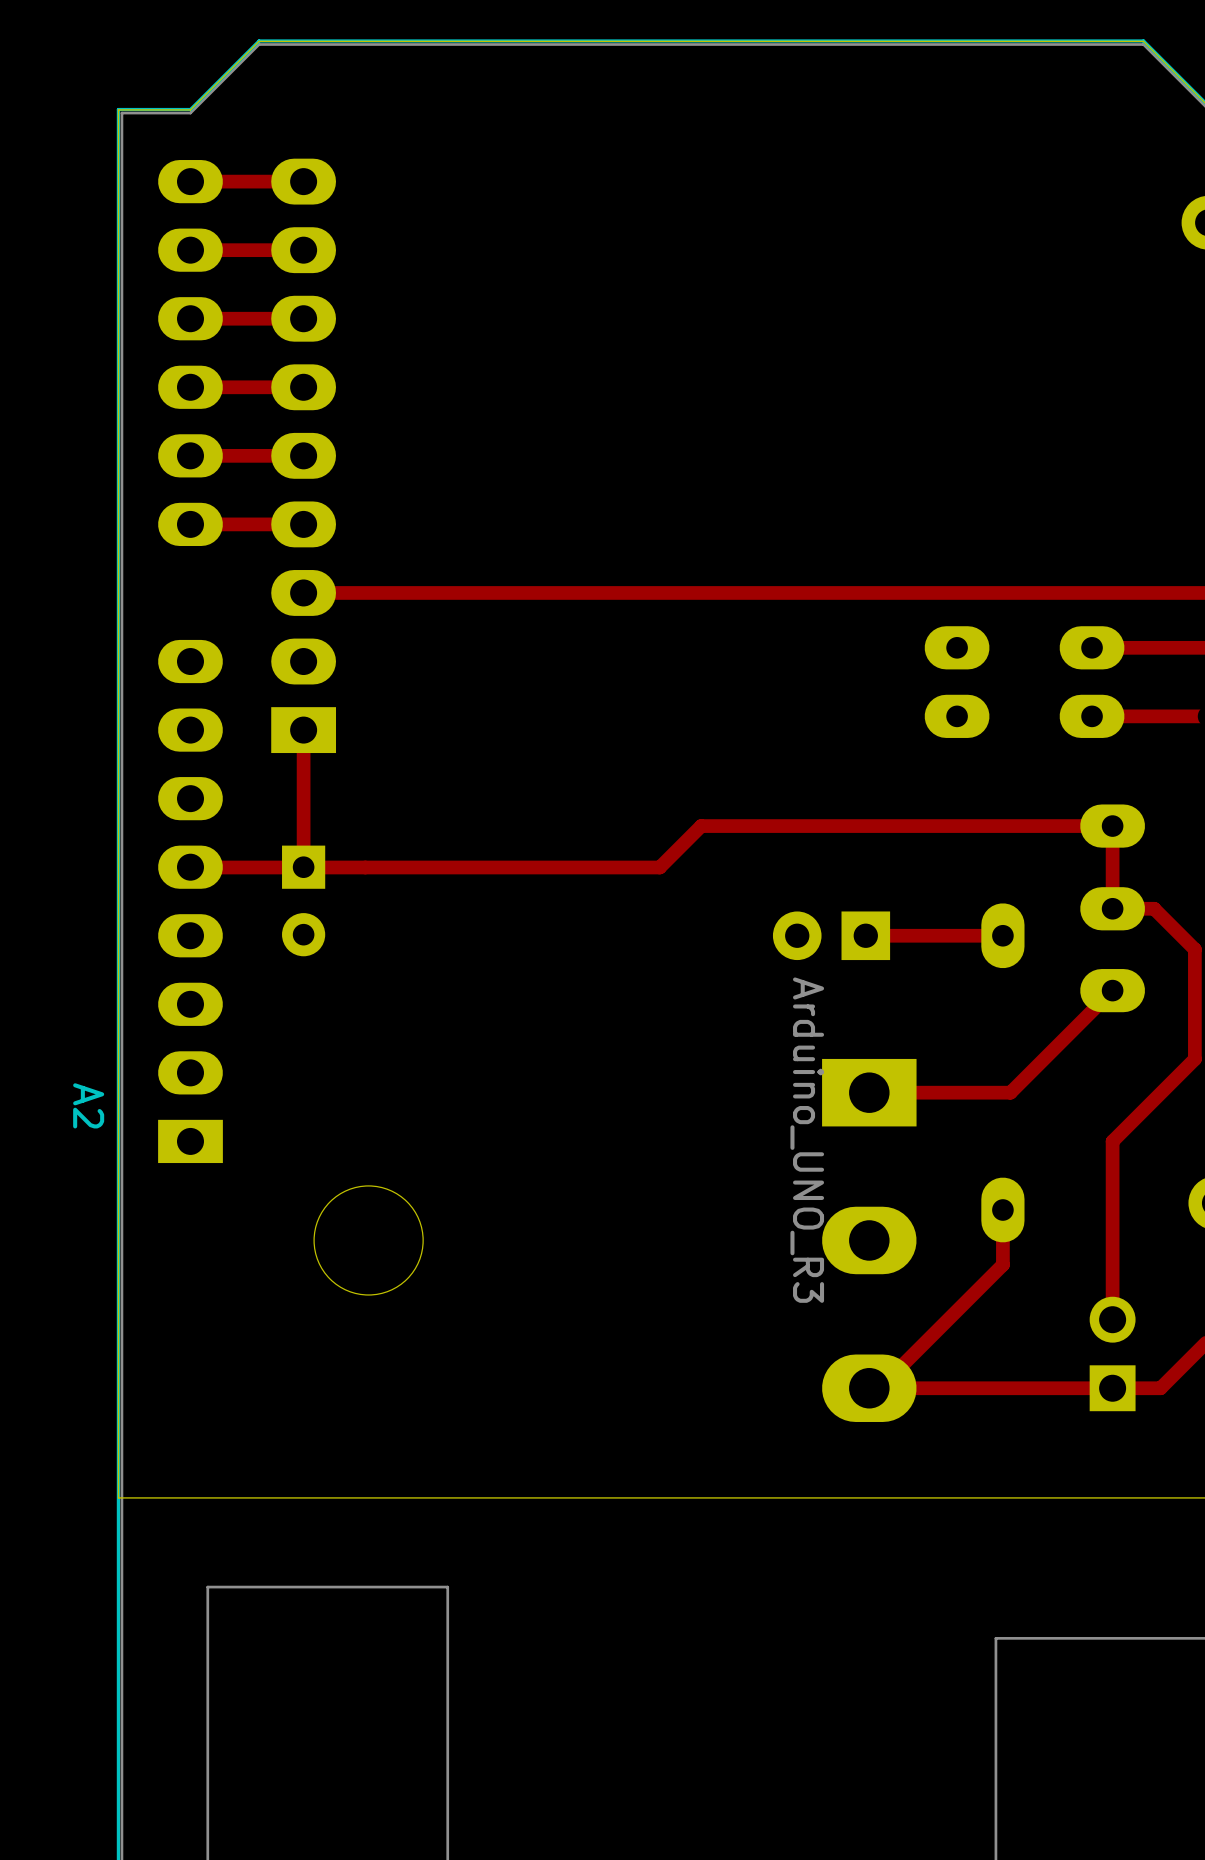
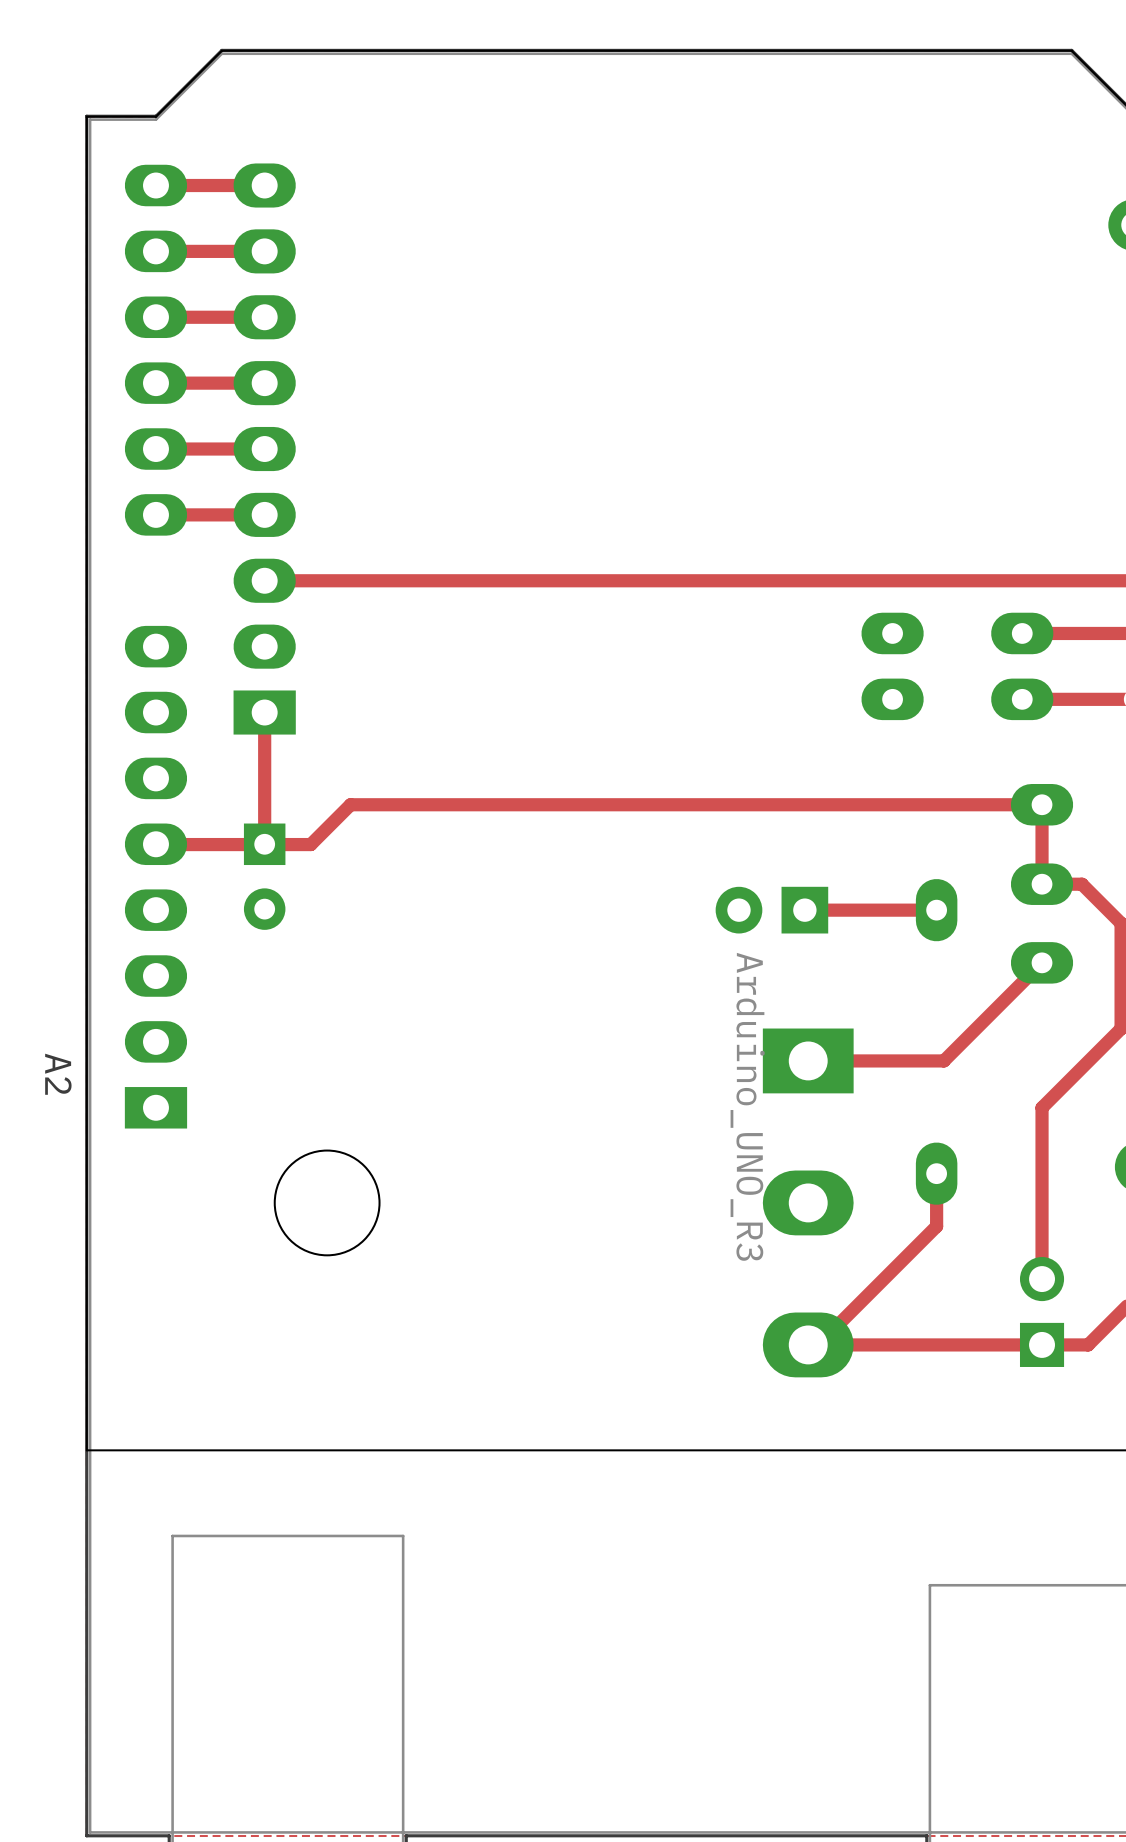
top track: (701, 826) (659, 867) (351, 867) -> (646, 804) (350, 804) (310, 844)

